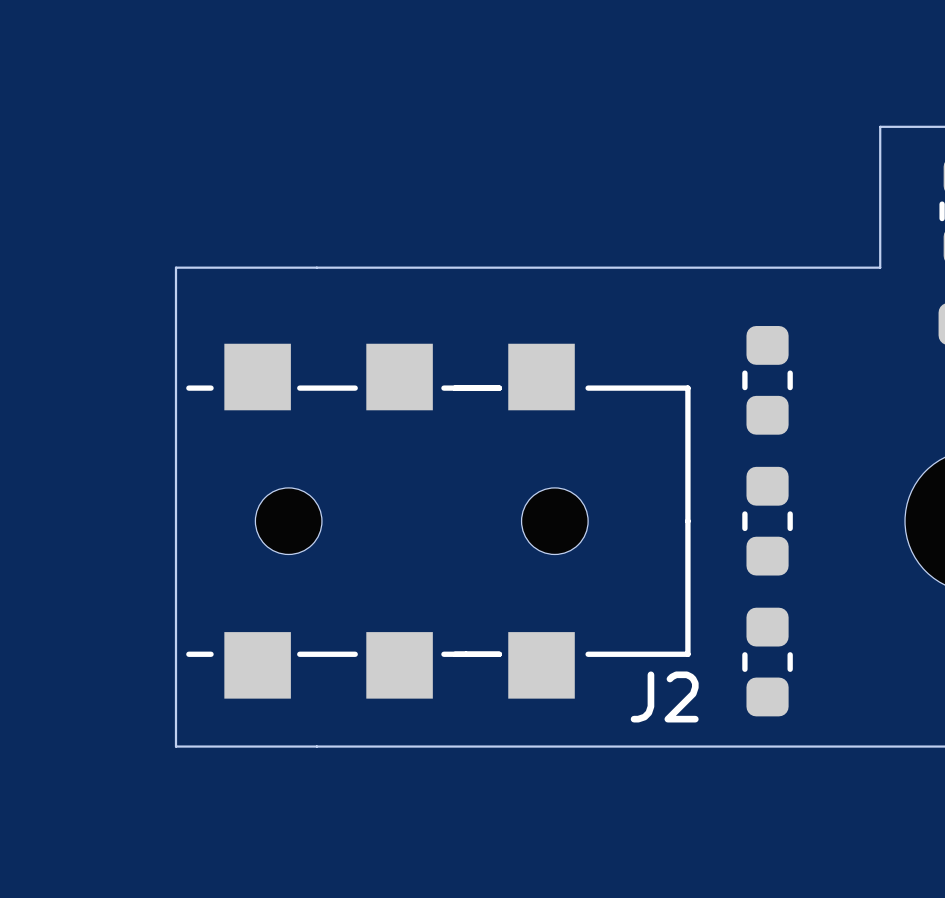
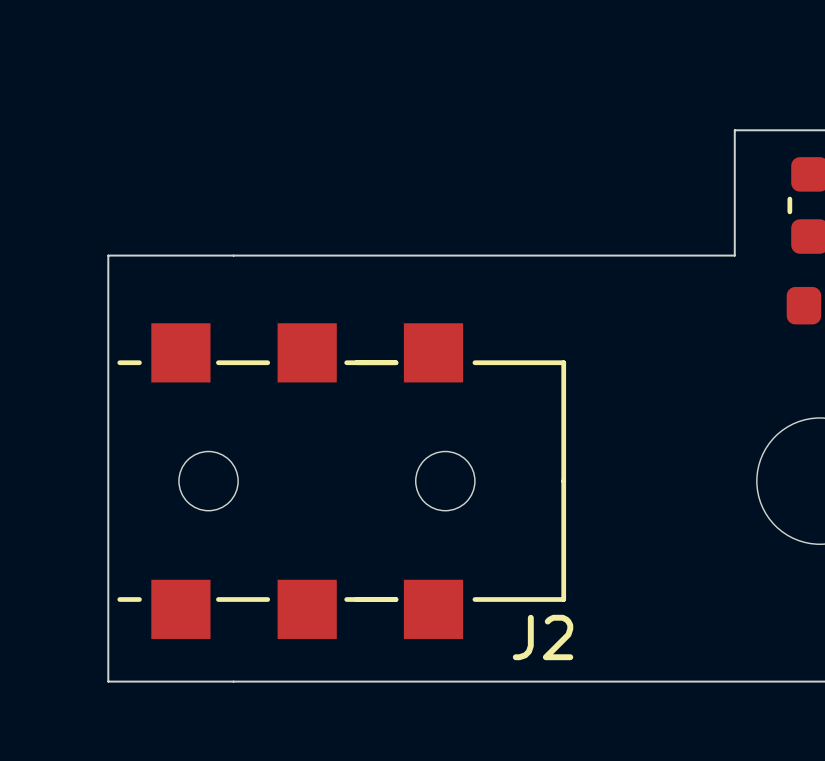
part: (767, 380) -> none
part: (767, 521) -> none
part: (767, 662) -> none

